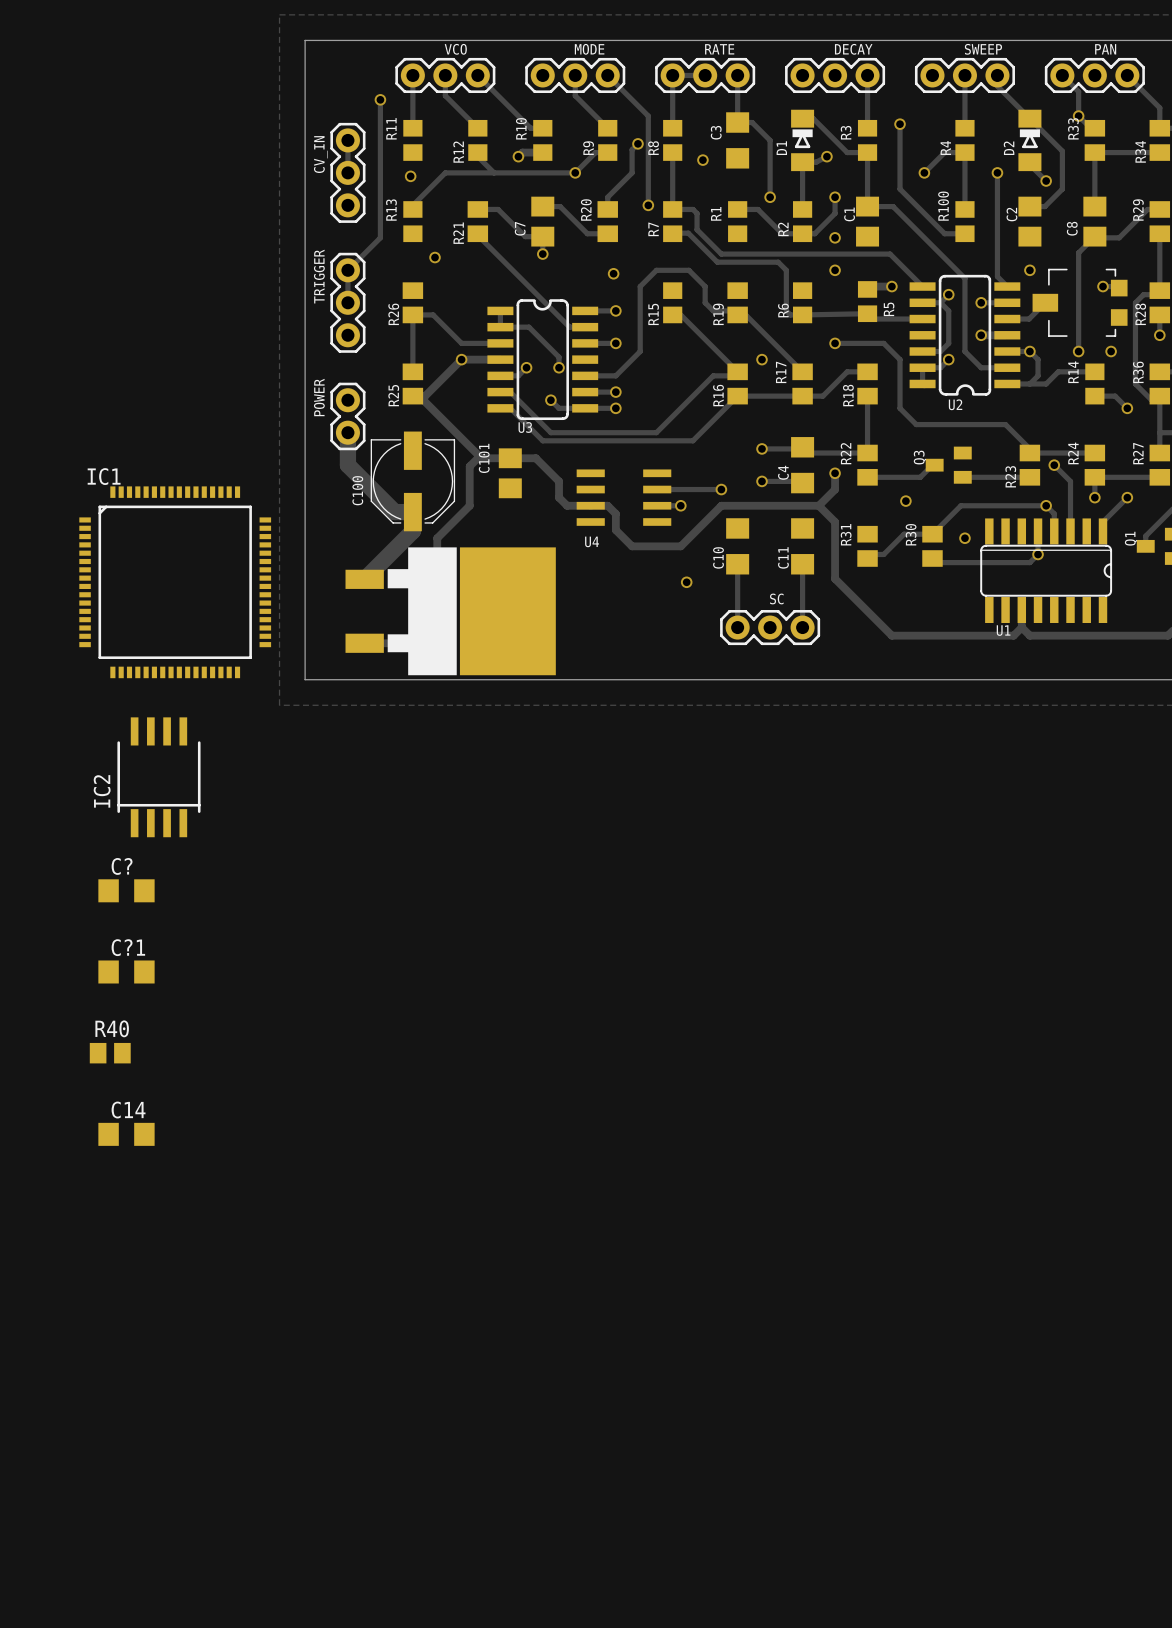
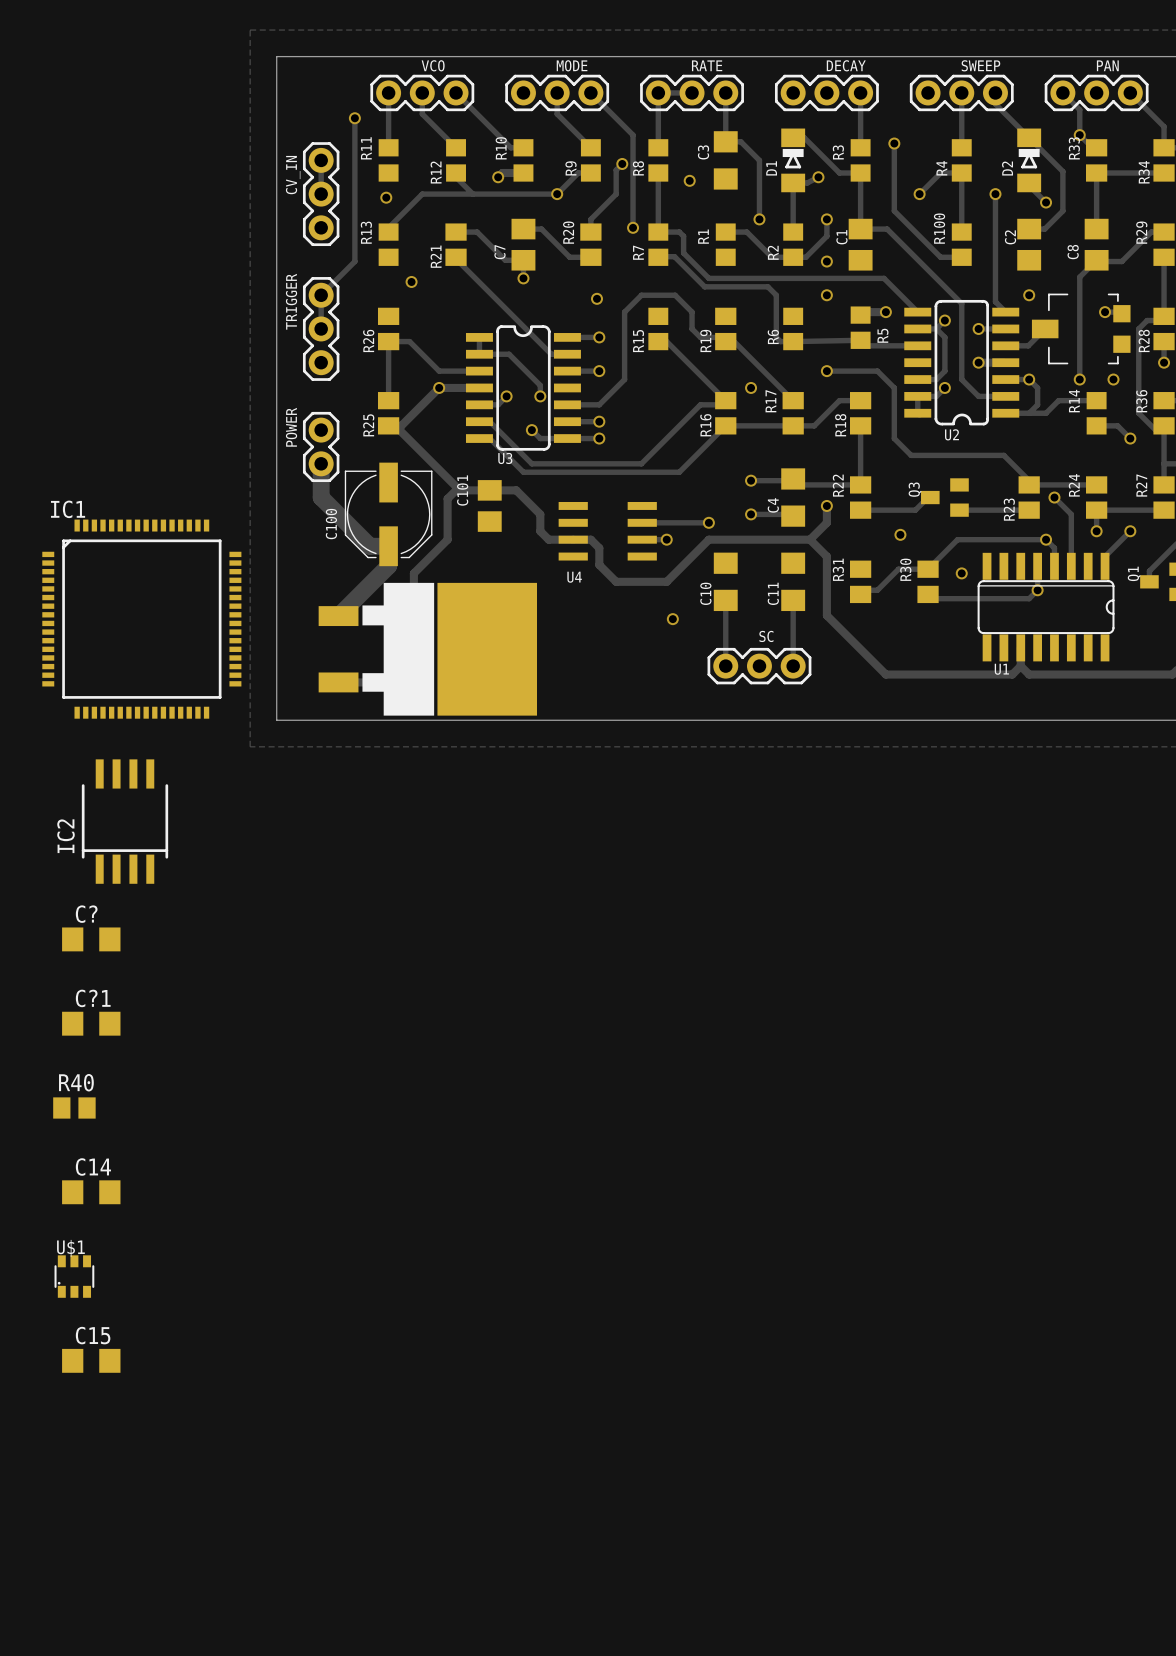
U$1: none -> (74, 1276)
C15: none -> (91, 1360)

